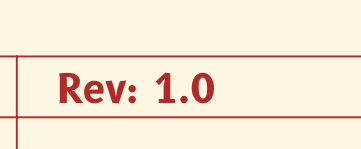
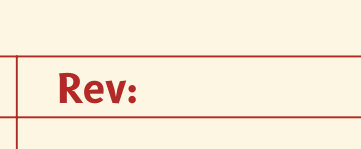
title block: Rev: 1.0 (136, 88) -> Rev: (97, 88)

